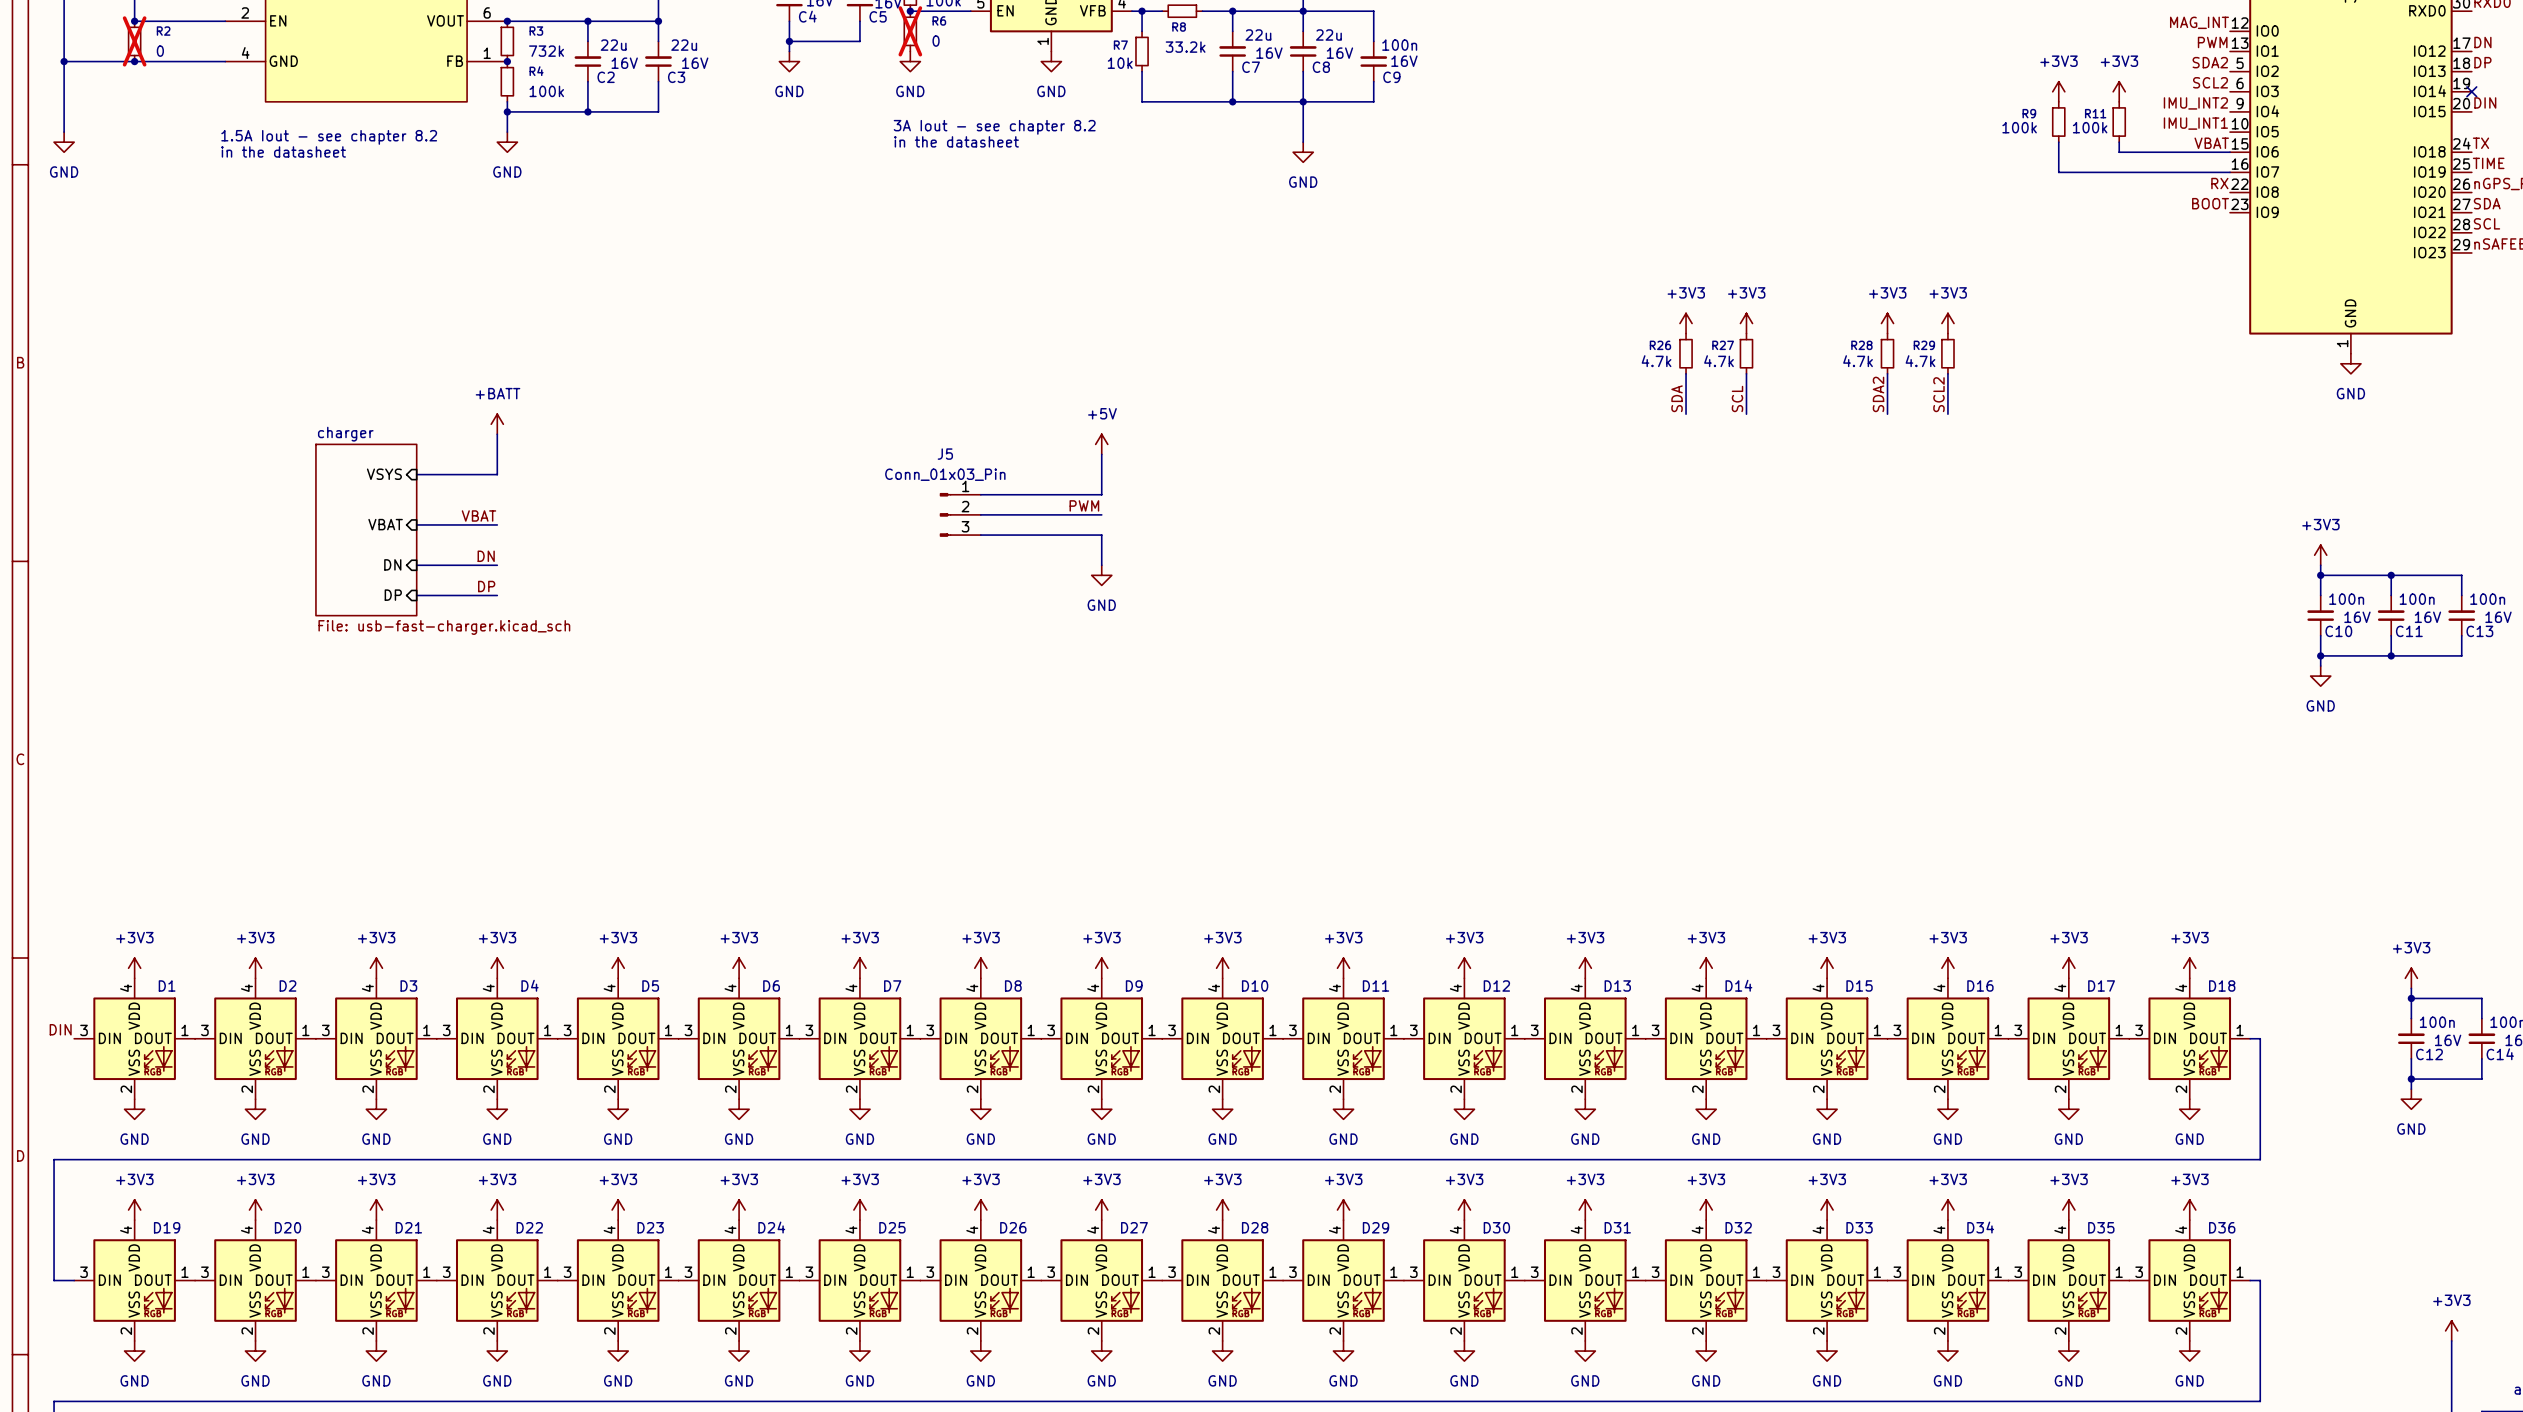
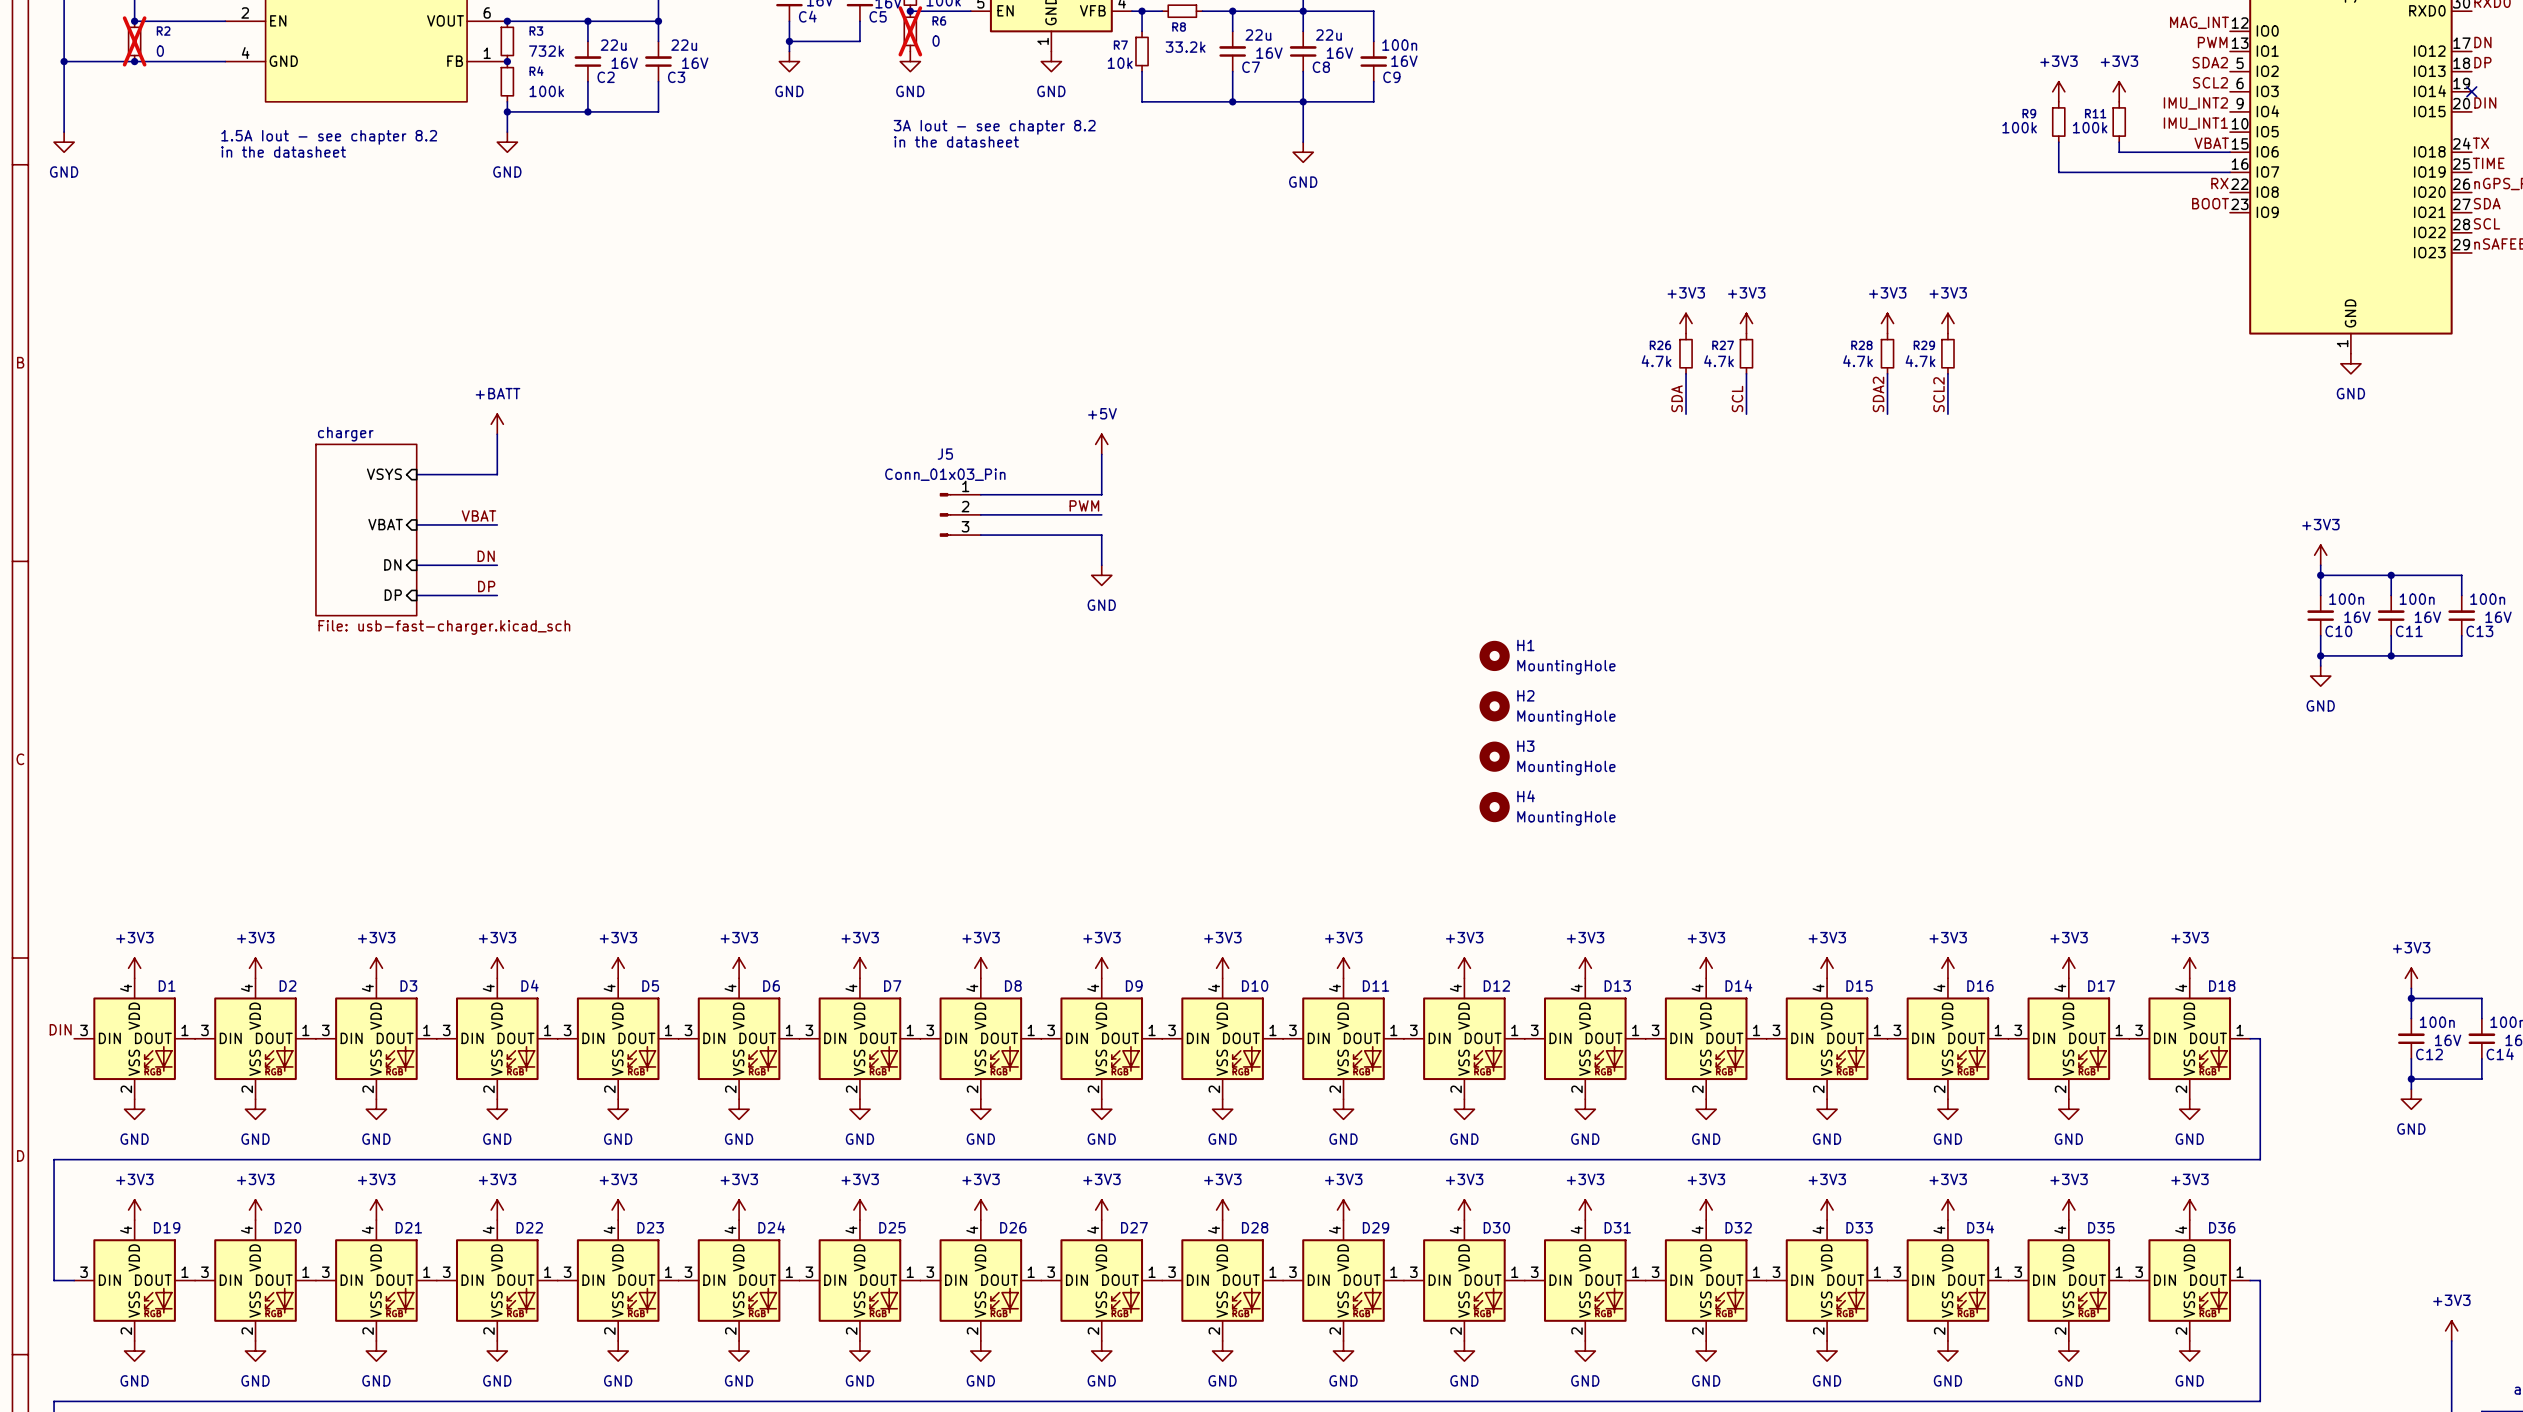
H1: none -> MountingHole (1494, 655)
H2: none -> MountingHole (1494, 706)
H3: none -> MountingHole (1494, 756)
H4: none -> MountingHole (1494, 807)

